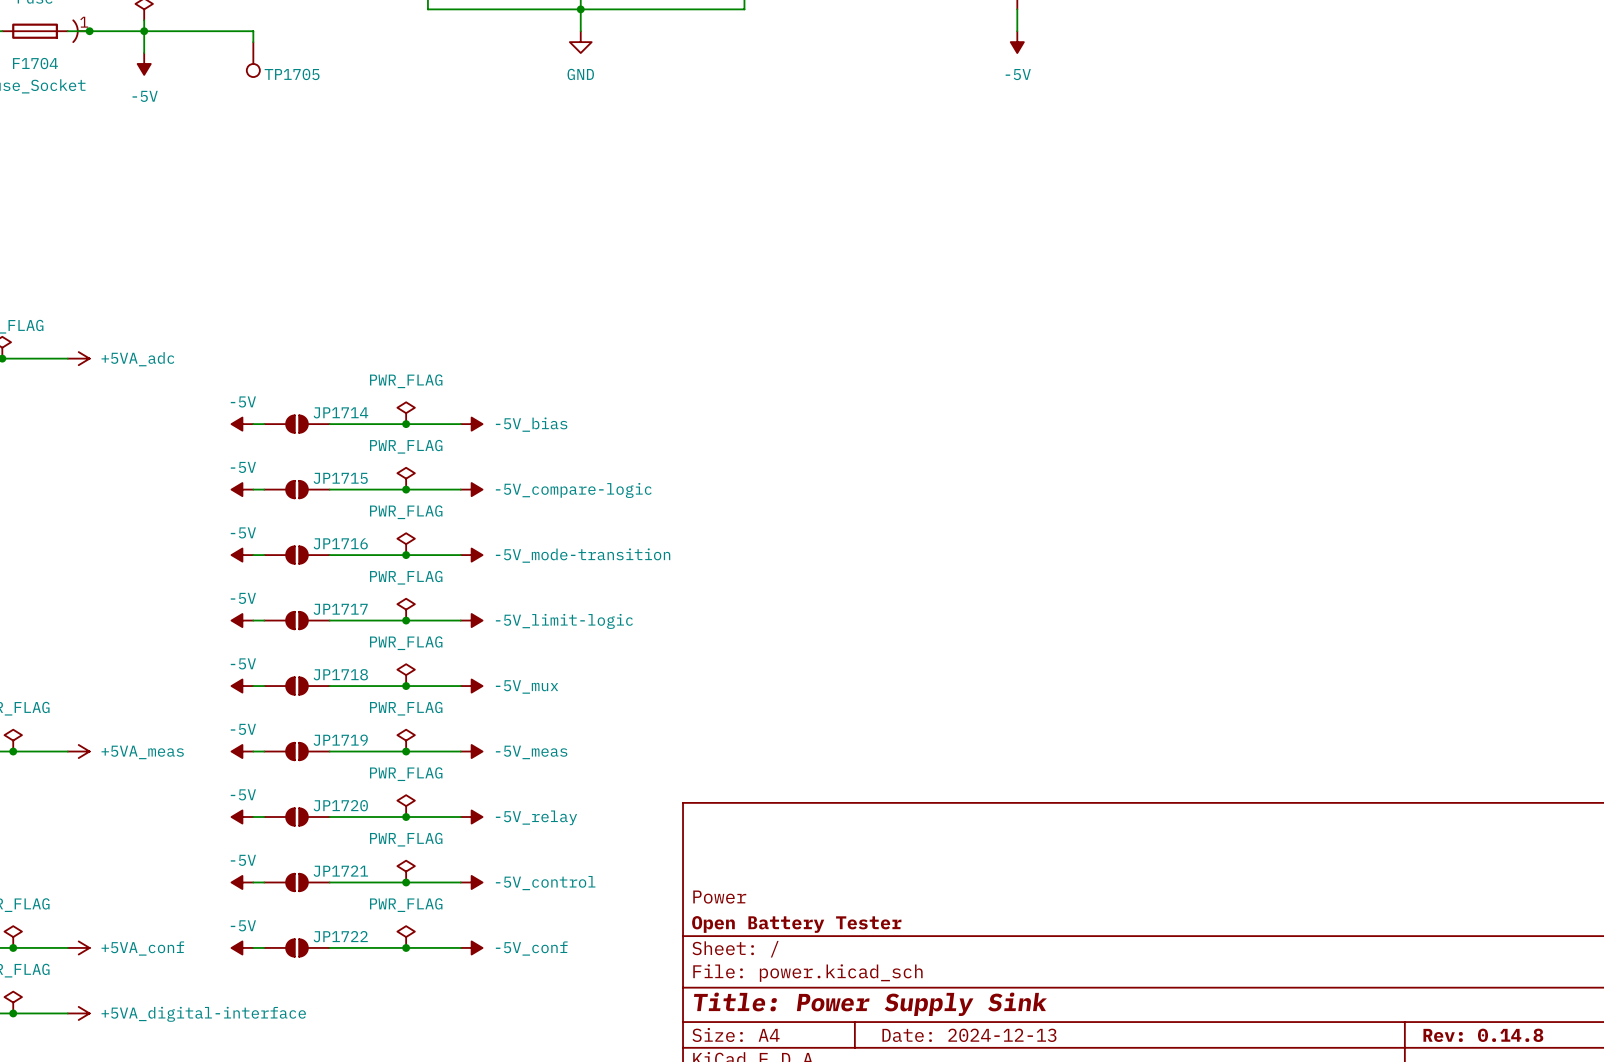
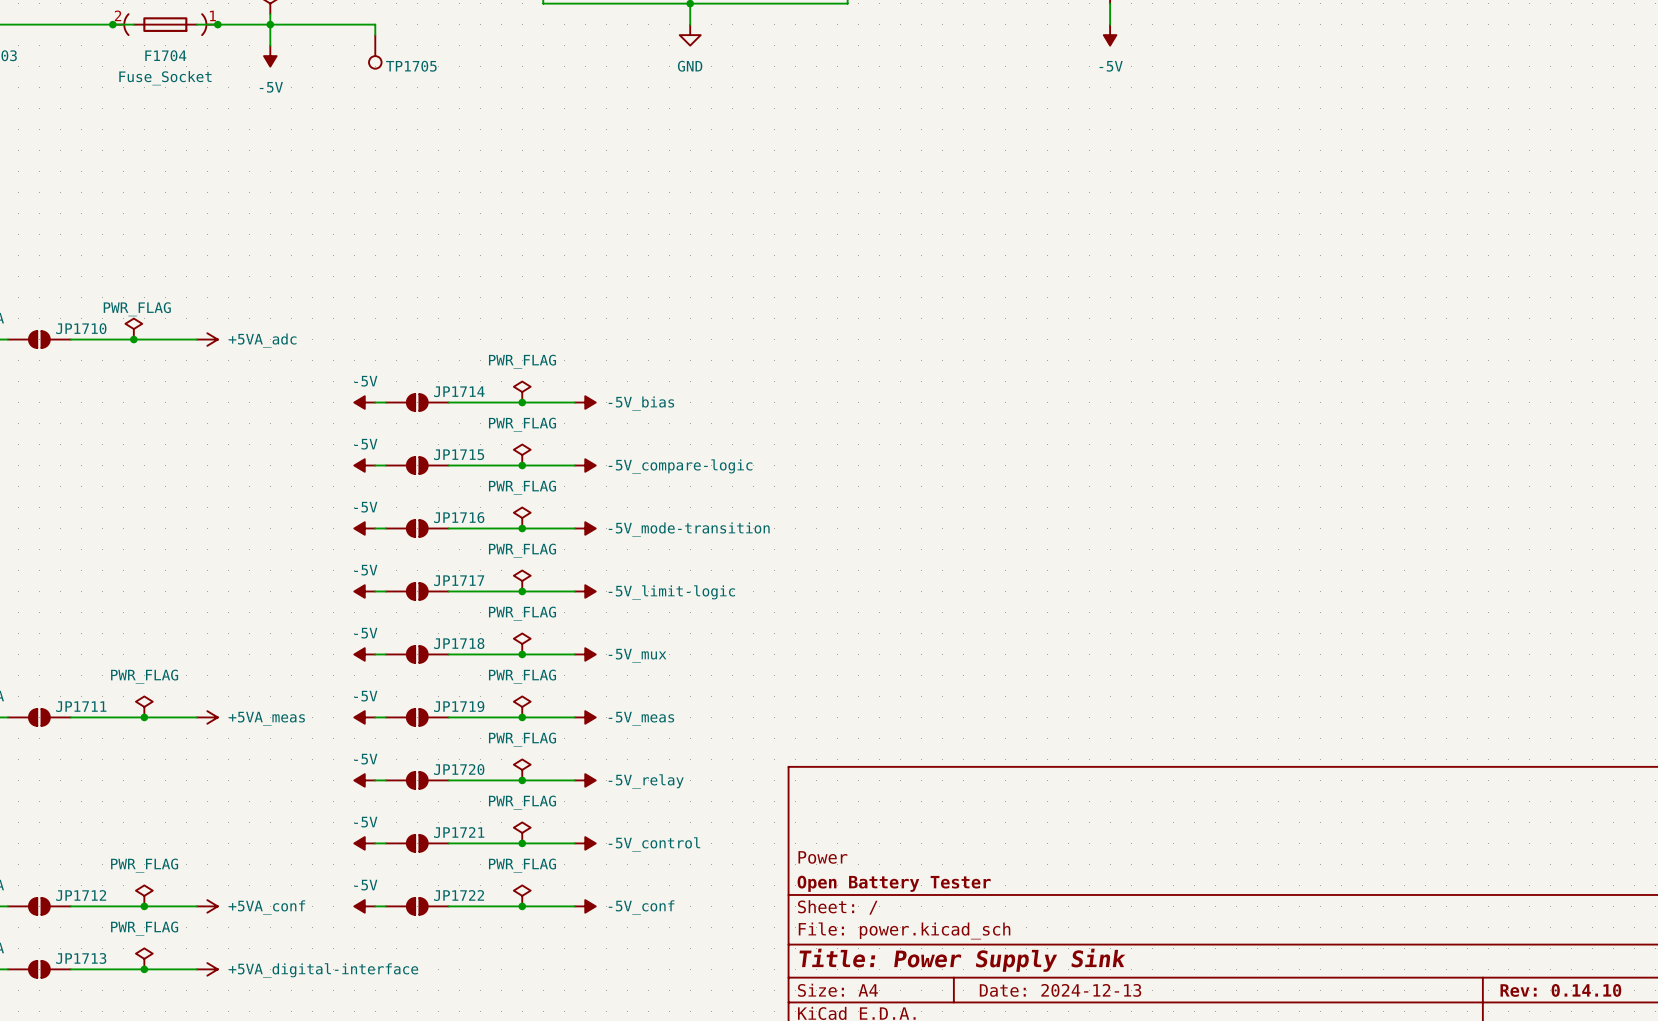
title block: Rev: 0.14.8 (1483, 1035) -> Rev: 0.14.10 (1560, 990)

